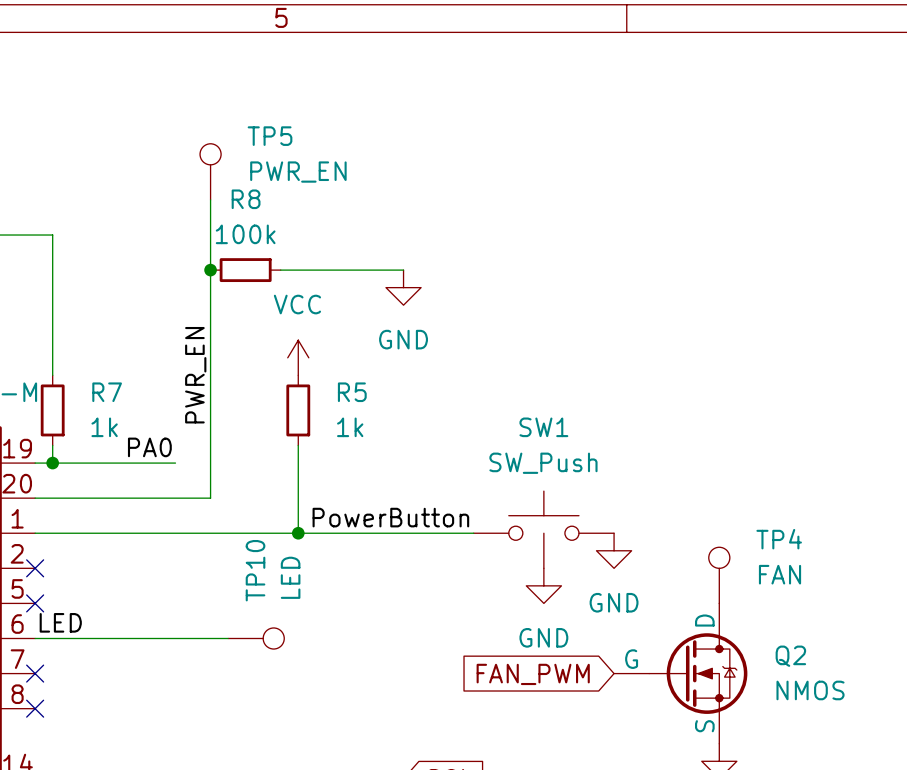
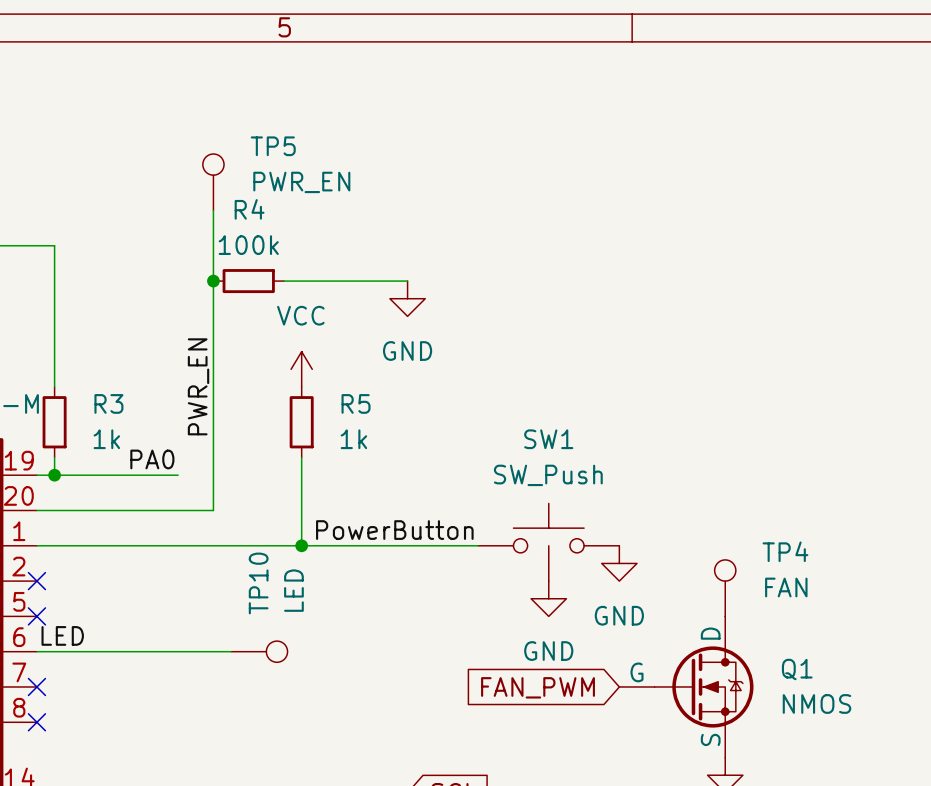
R8 name: R8 (246, 199) -> R4 (249, 209)
R7 name: R7 (107, 392) -> R3 (108, 403)
Q2 name: Q2 (790, 656) -> Q1 (797, 669)

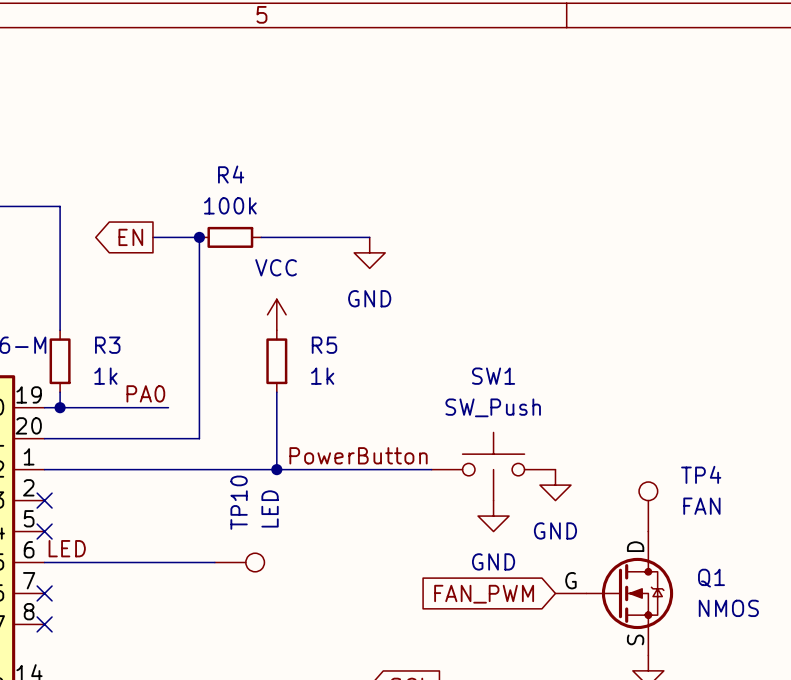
TP5: PWR_EN (213, 182) -> none
wire: (213, 210) (213, 281) -> (152, 237) (199, 237)
global label: none -> EN (130, 237)
label: PWR_EN (198, 386) -> none

